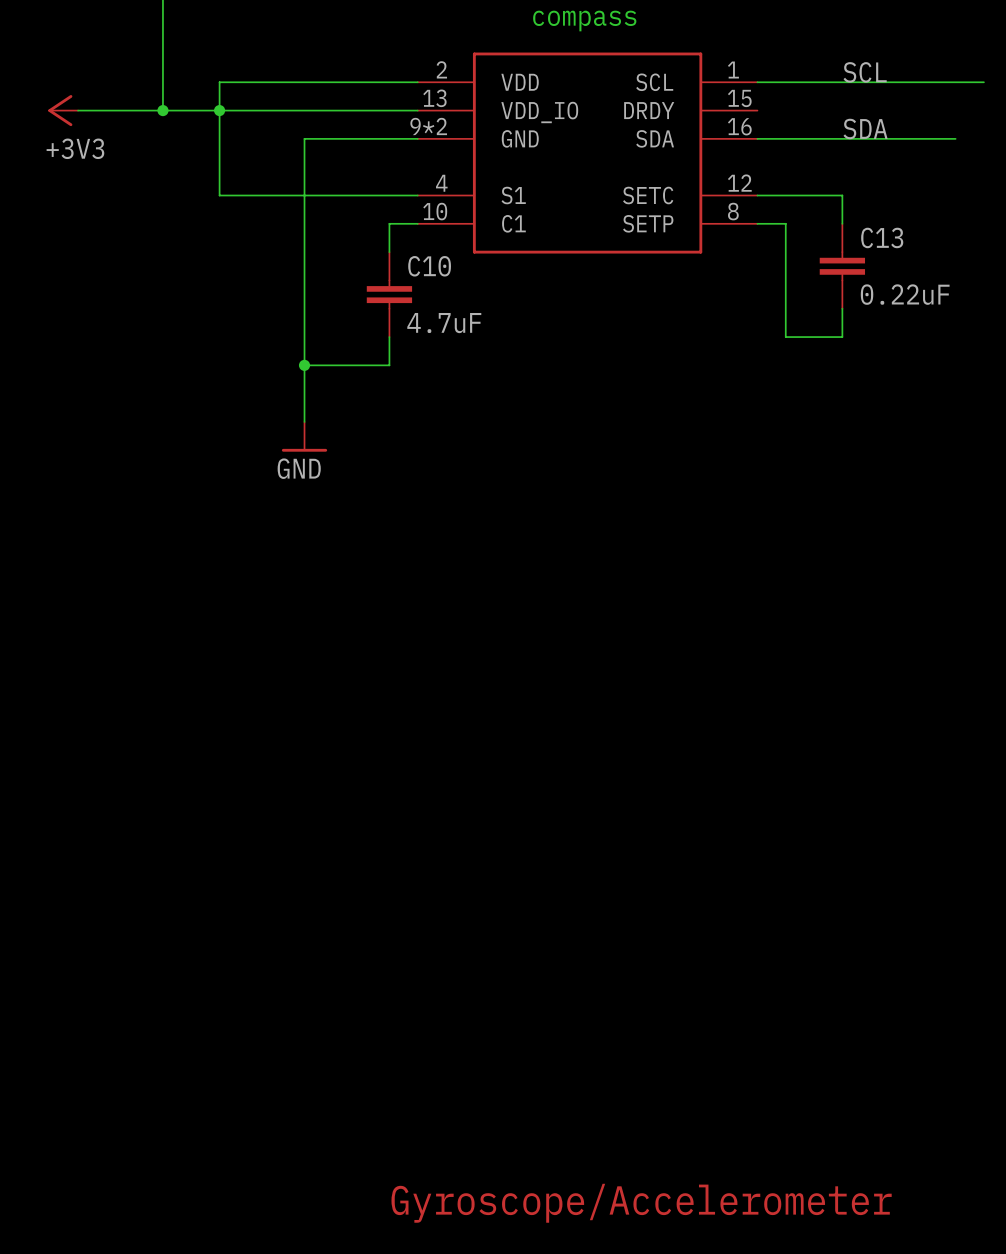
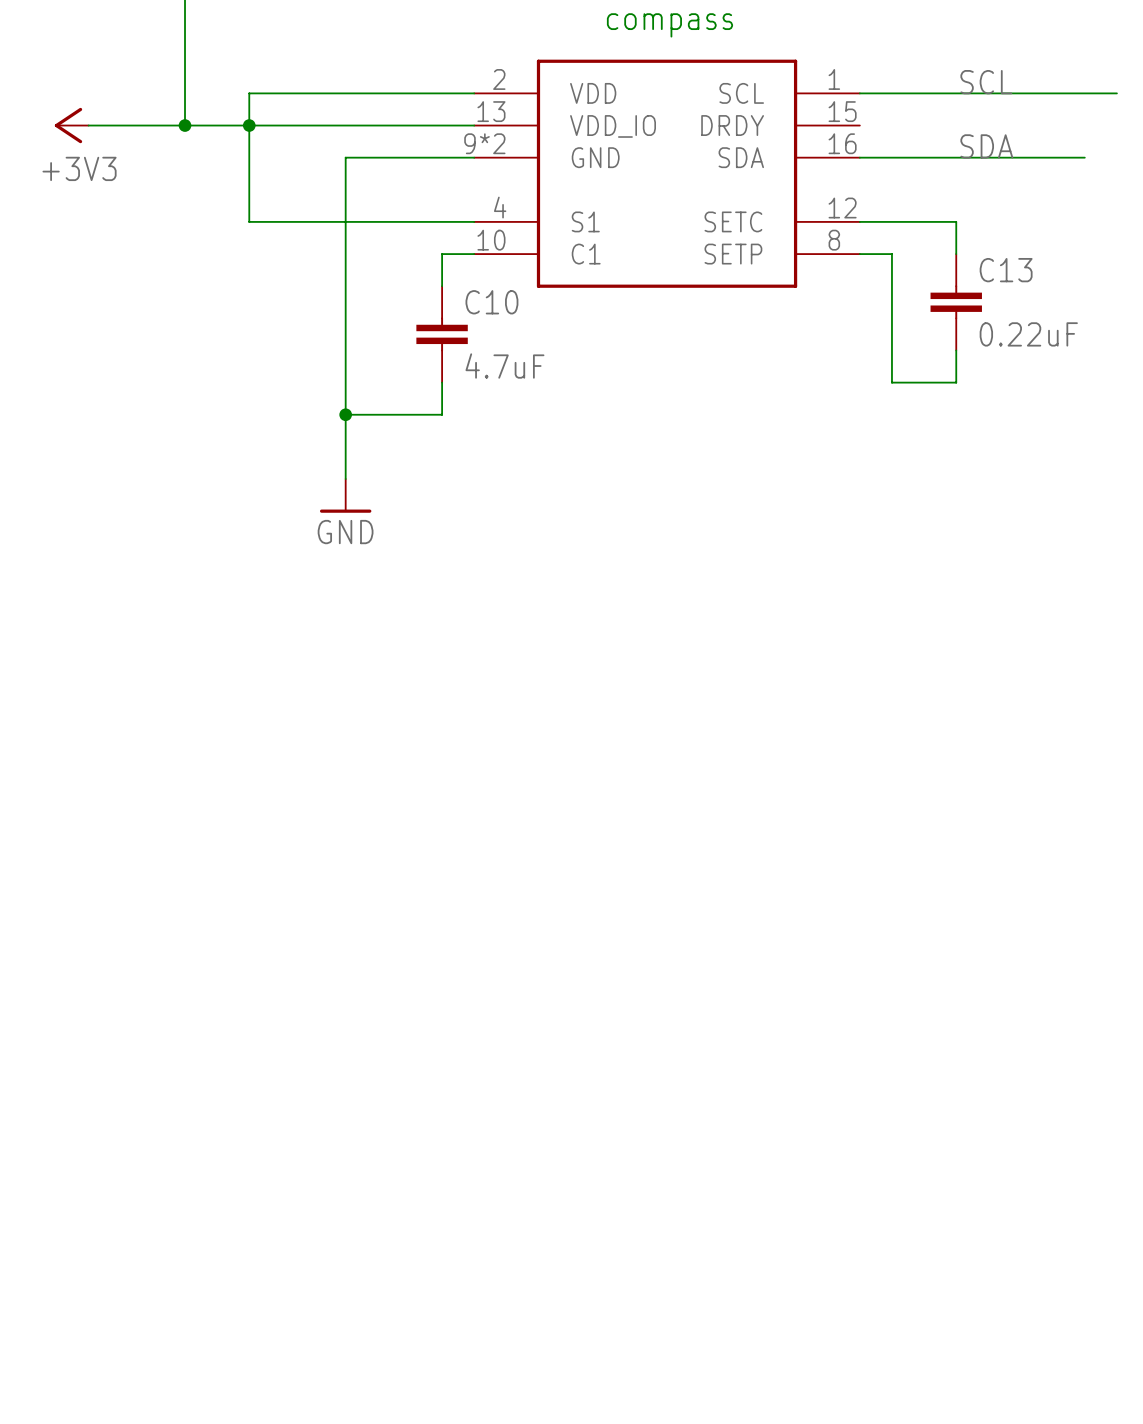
text: Gyroscope/Accelerometer (641, 1203) -> none

